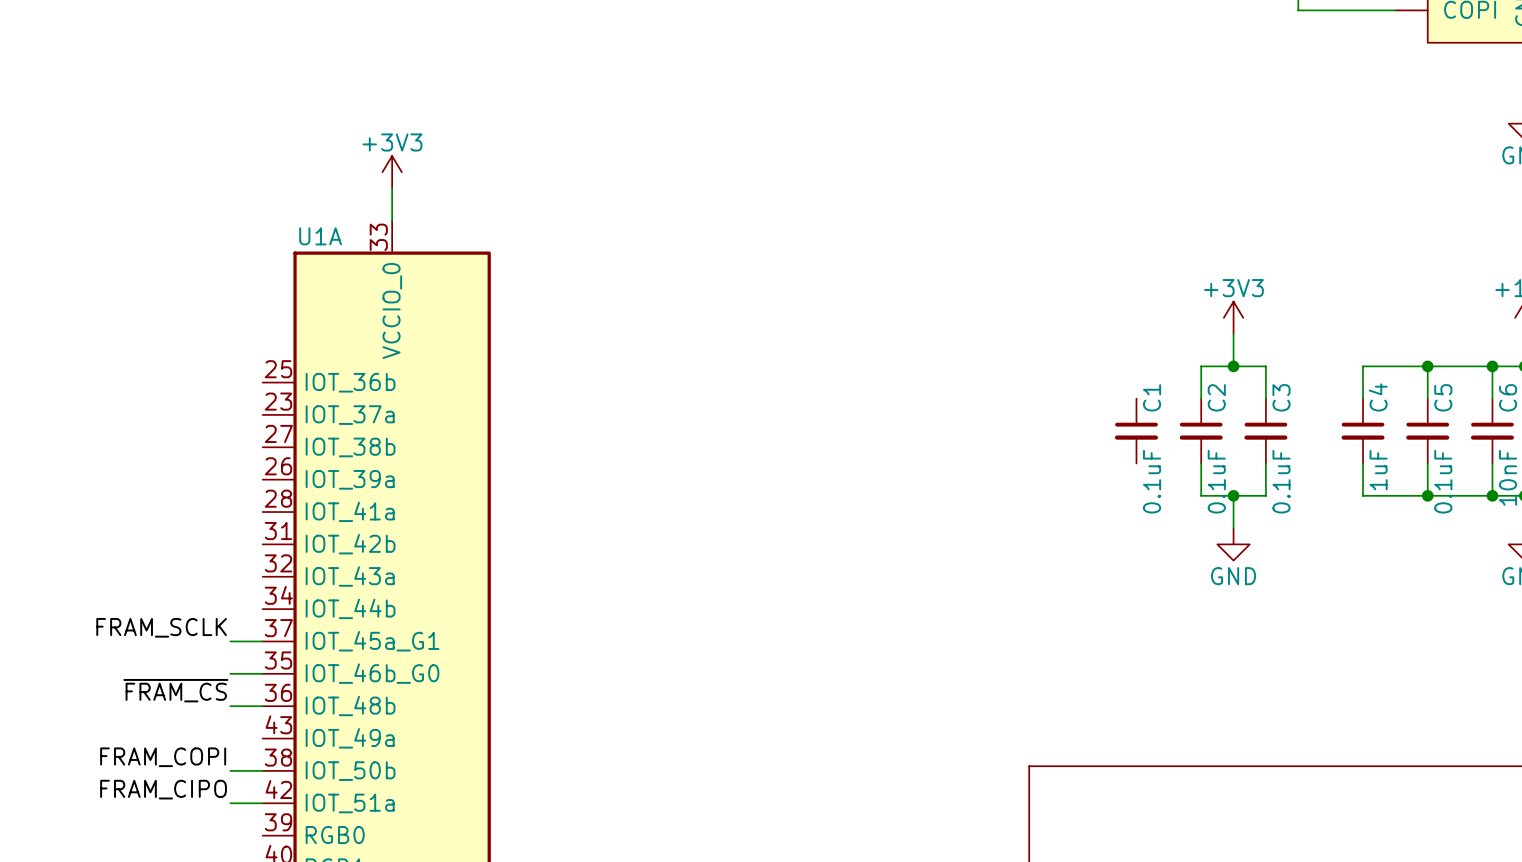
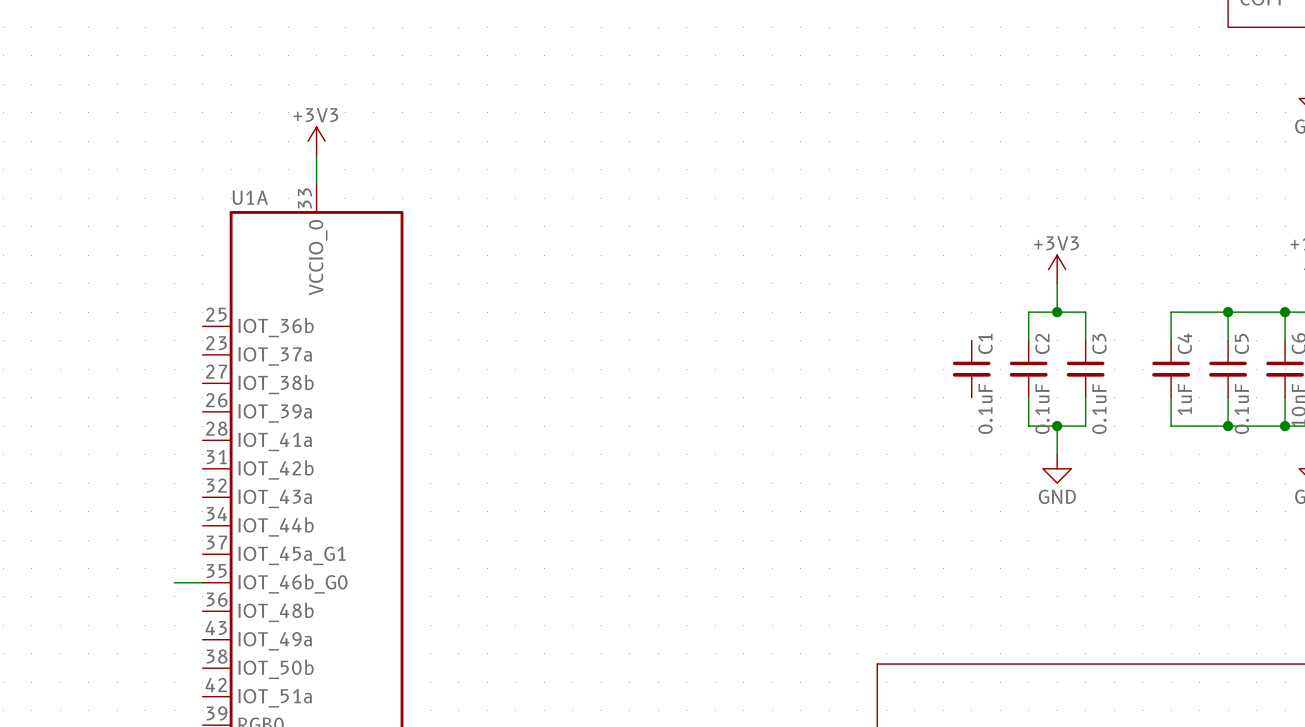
label: FRAM_SCLK (161, 627) -> none
wire: (230, 641) (262, 641) -> none
label: ~{FRAM_CS} (175, 690) -> none
wire: (230, 706) (262, 706) -> none
label: FRAM_COPI (163, 757) -> none
wire: (230, 770) (262, 770) -> none
label: FRAM_CIPO (163, 789) -> none
wire: (230, 803) (262, 803) -> none

